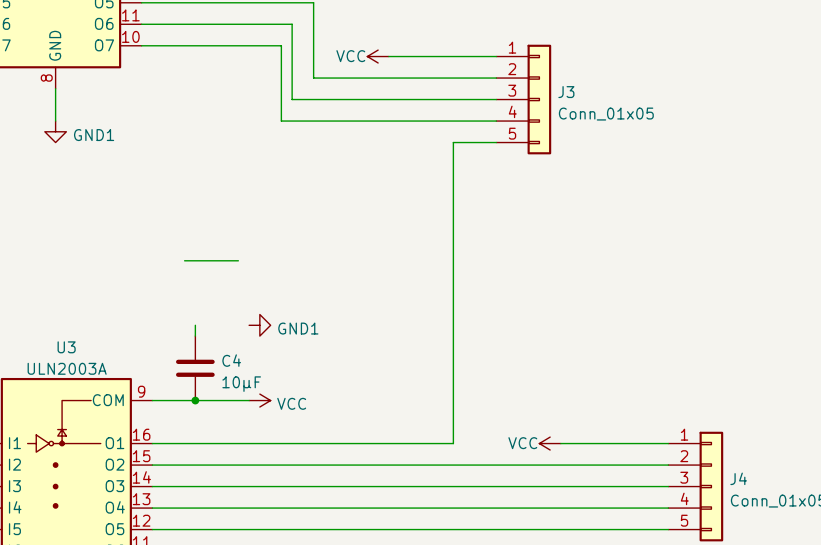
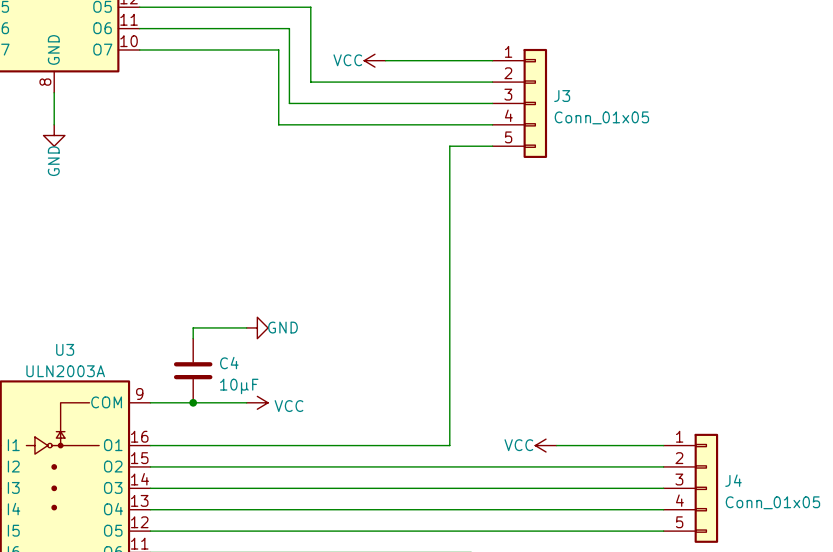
power symbol: GND1 (55, 131) -> GND (54, 135)
wire: (184, 260) (238, 260) -> (193, 327) (246, 327)
power symbol: GND1 (259, 325) -> GND (257, 327)

